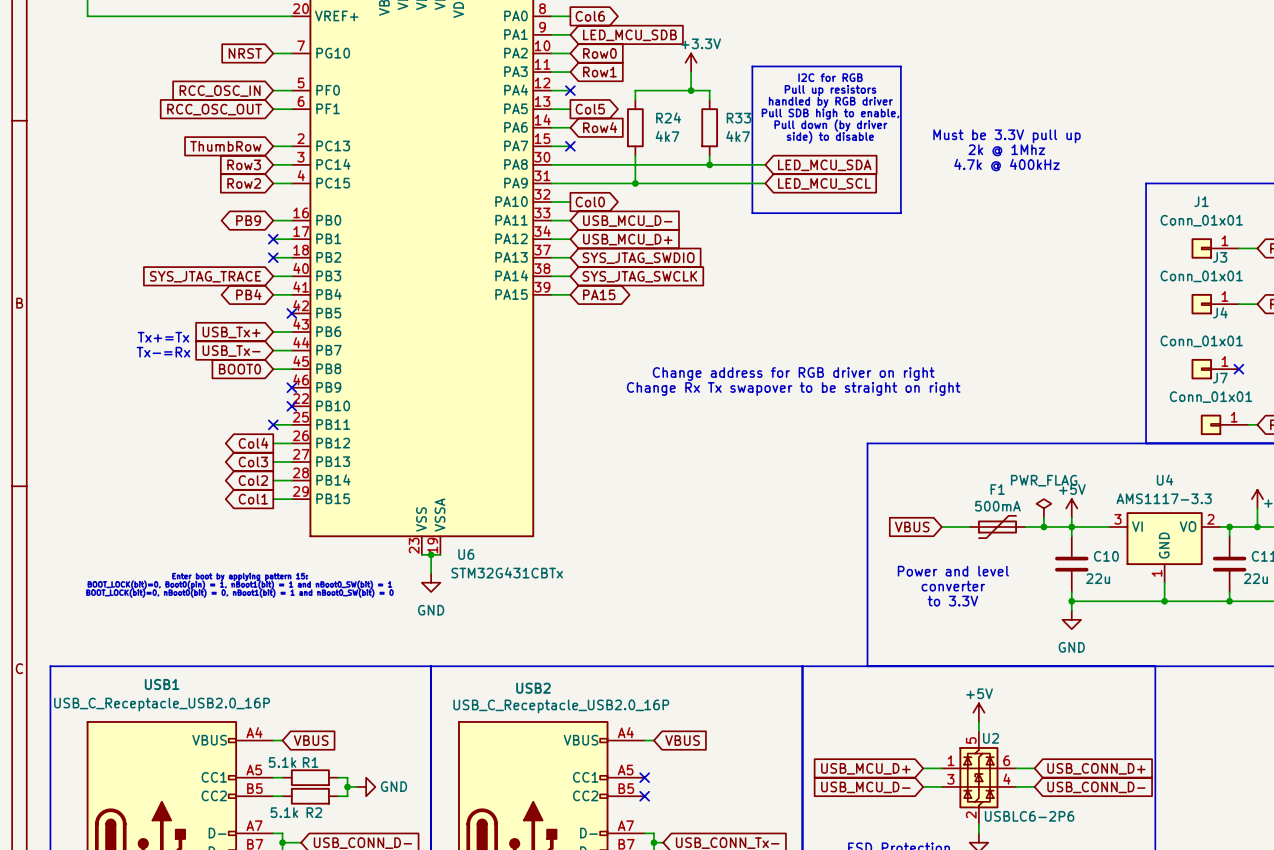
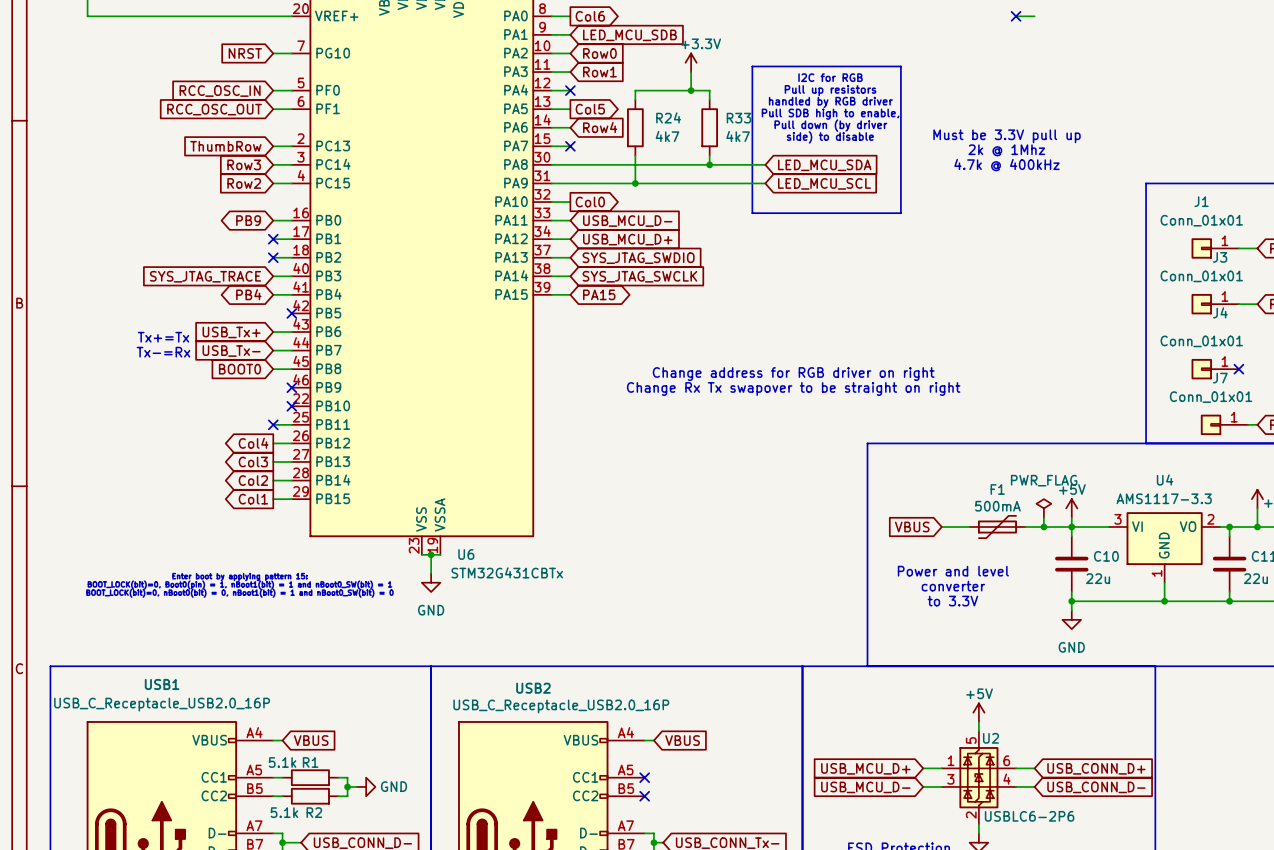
wire: none -> (1016, 16) (1034, 16)
no-connect mark: none -> (1016, 16)

